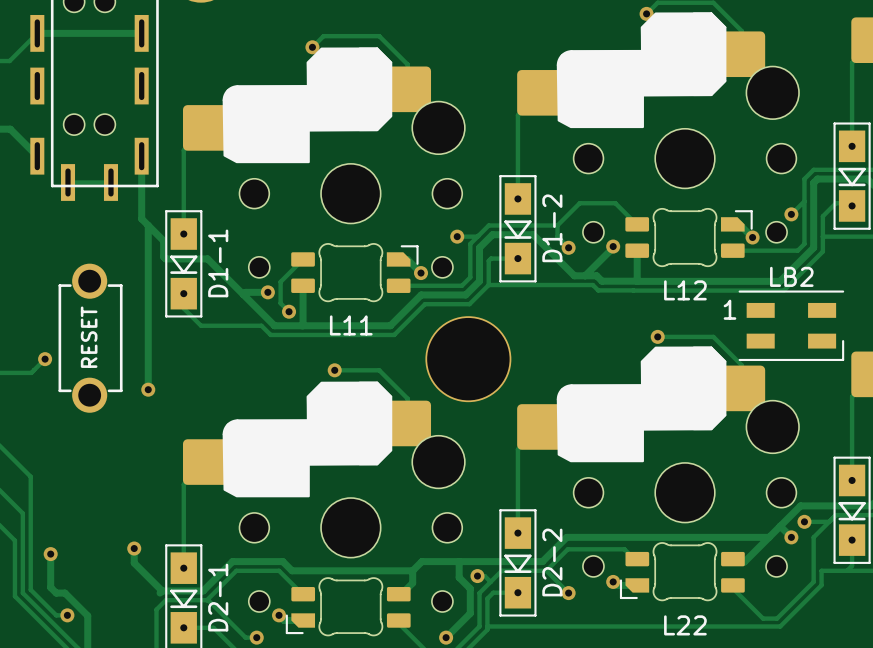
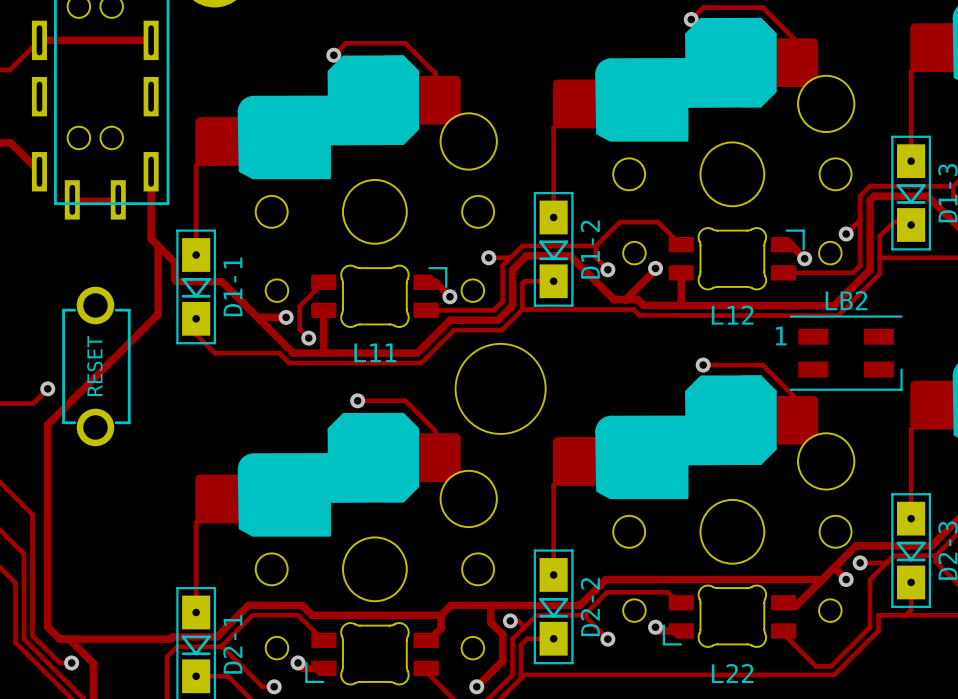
track: (148, 289) (148, 389) -> (158, 314) (47, 424) (47, 627) (53, 633)
via: (148, 389) -> none
track: (134, 548) (134, 563) (162, 590) -> none
via: (134, 548) -> none
track: (50, 554) (50, 587) -> none
via: (50, 554) -> none
track: none -> (69, 639) (170, 639)

